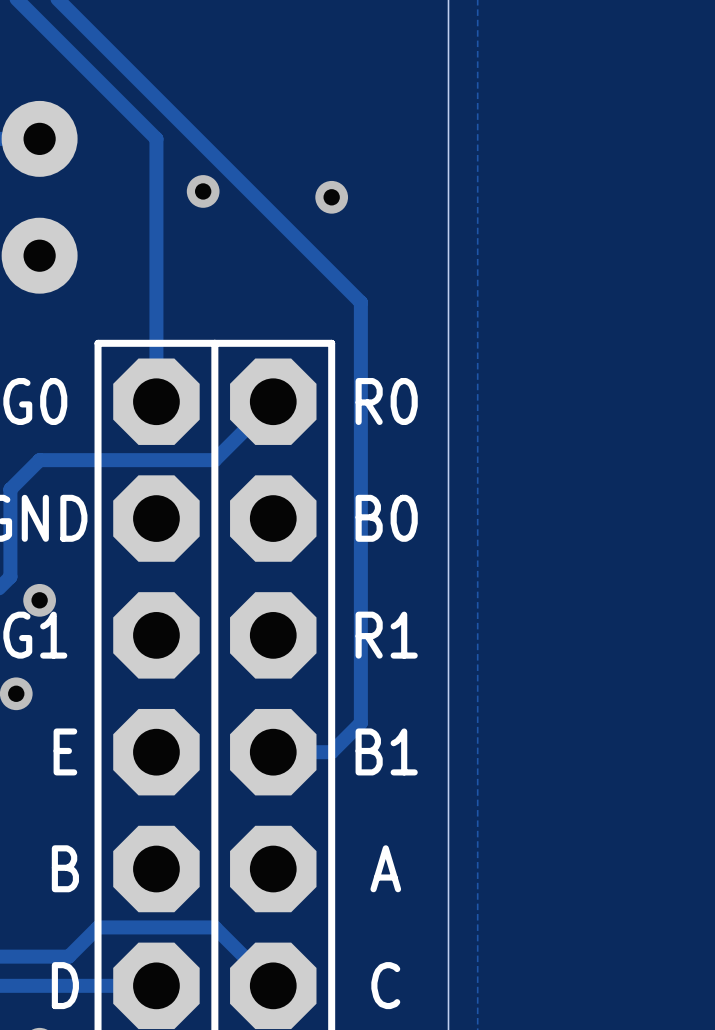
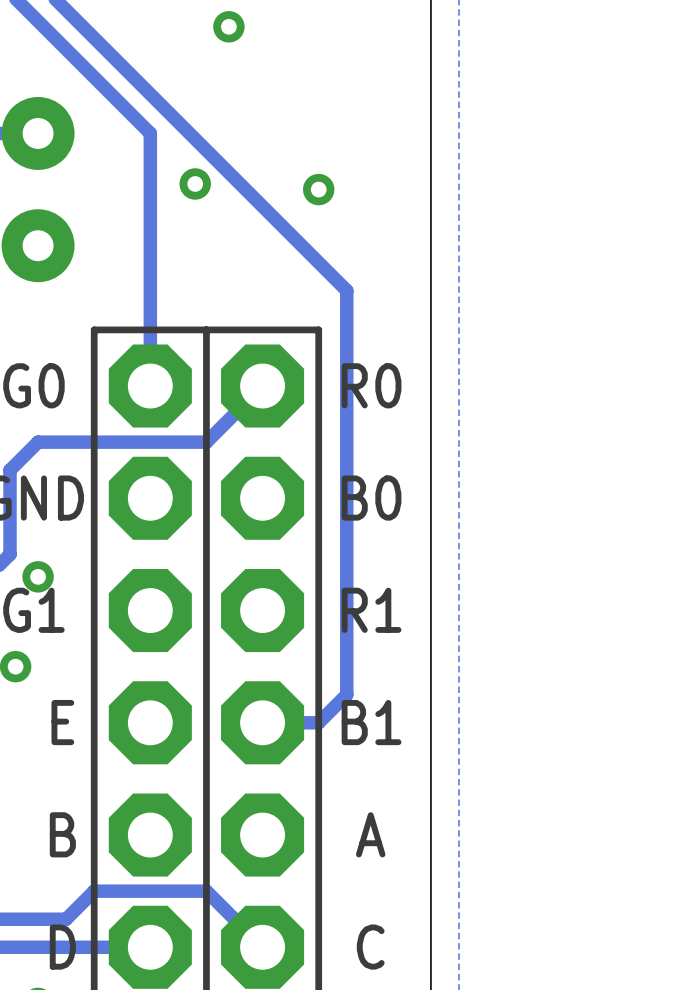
via: none -> (228, 26)

